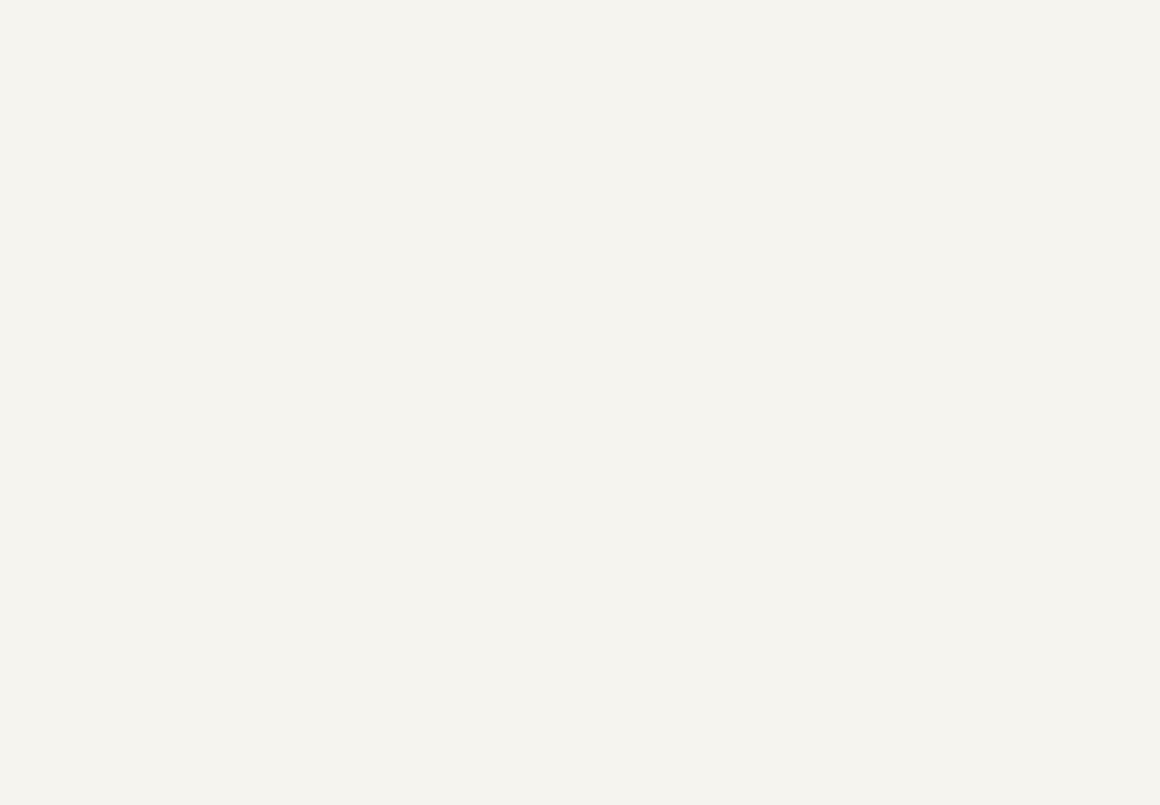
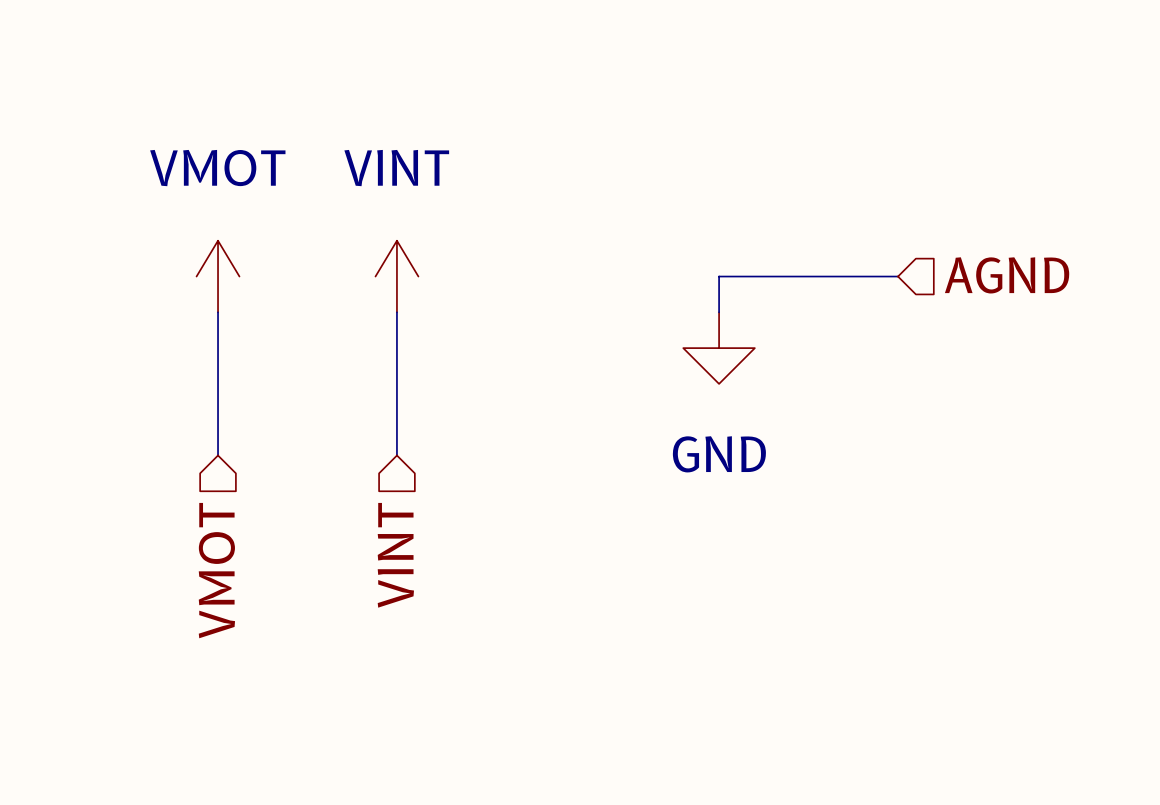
hierarchical label: none -> AGND (1007, 275)
power symbol: none -> VMOT (218, 276)
power symbol: none -> VINT (396, 276)
wire: none -> (898, 276) (719, 276) (719, 312)
wire: none -> (218, 312) (218, 455)
wire: none -> (396, 312) (396, 455)
power symbol: none -> GND (719, 348)
hierarchical label: none -> VINT (395, 555)
hierarchical label: none -> VMOT (216, 570)

